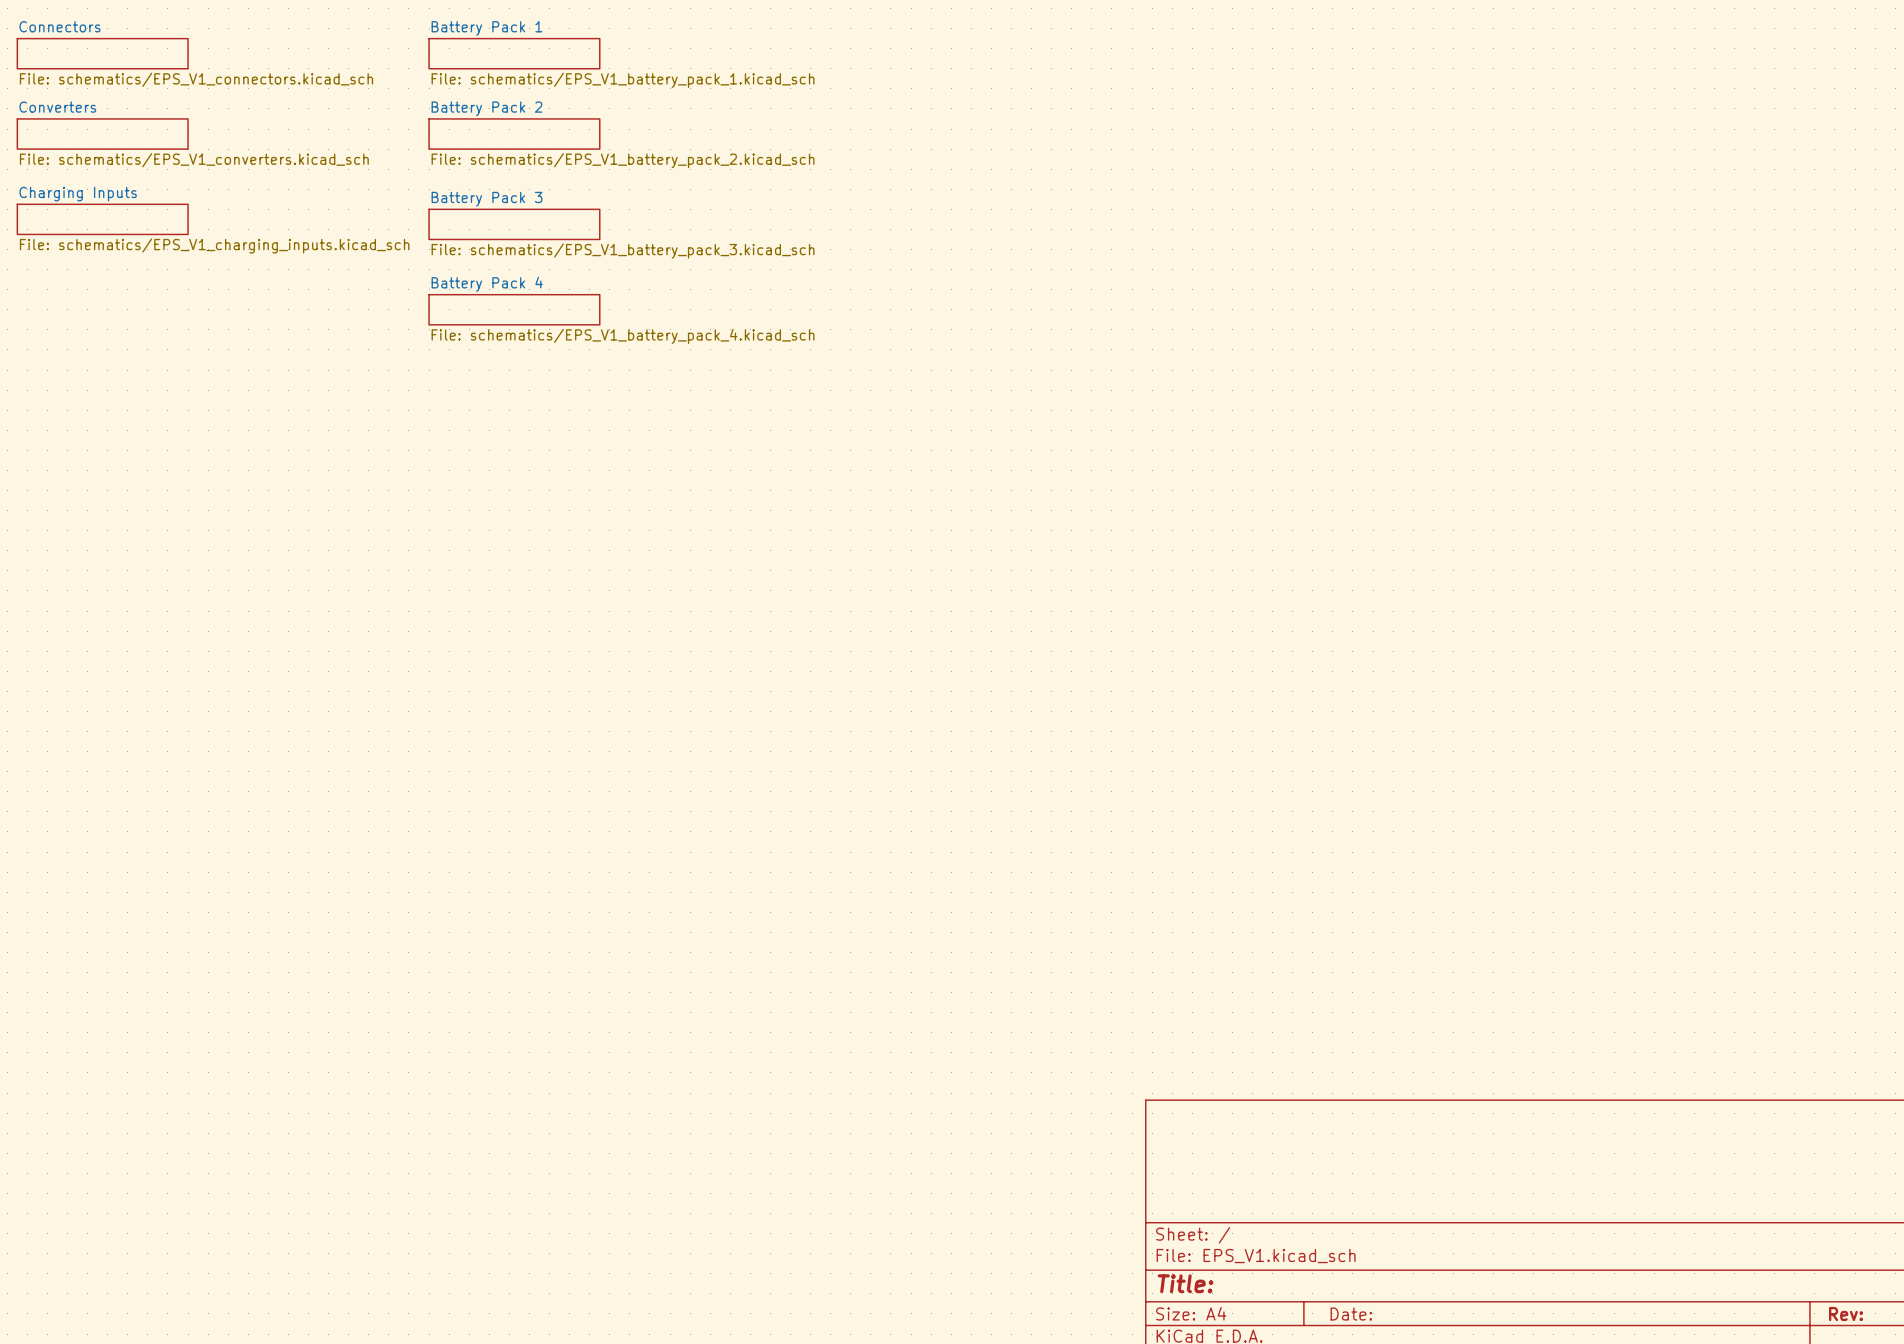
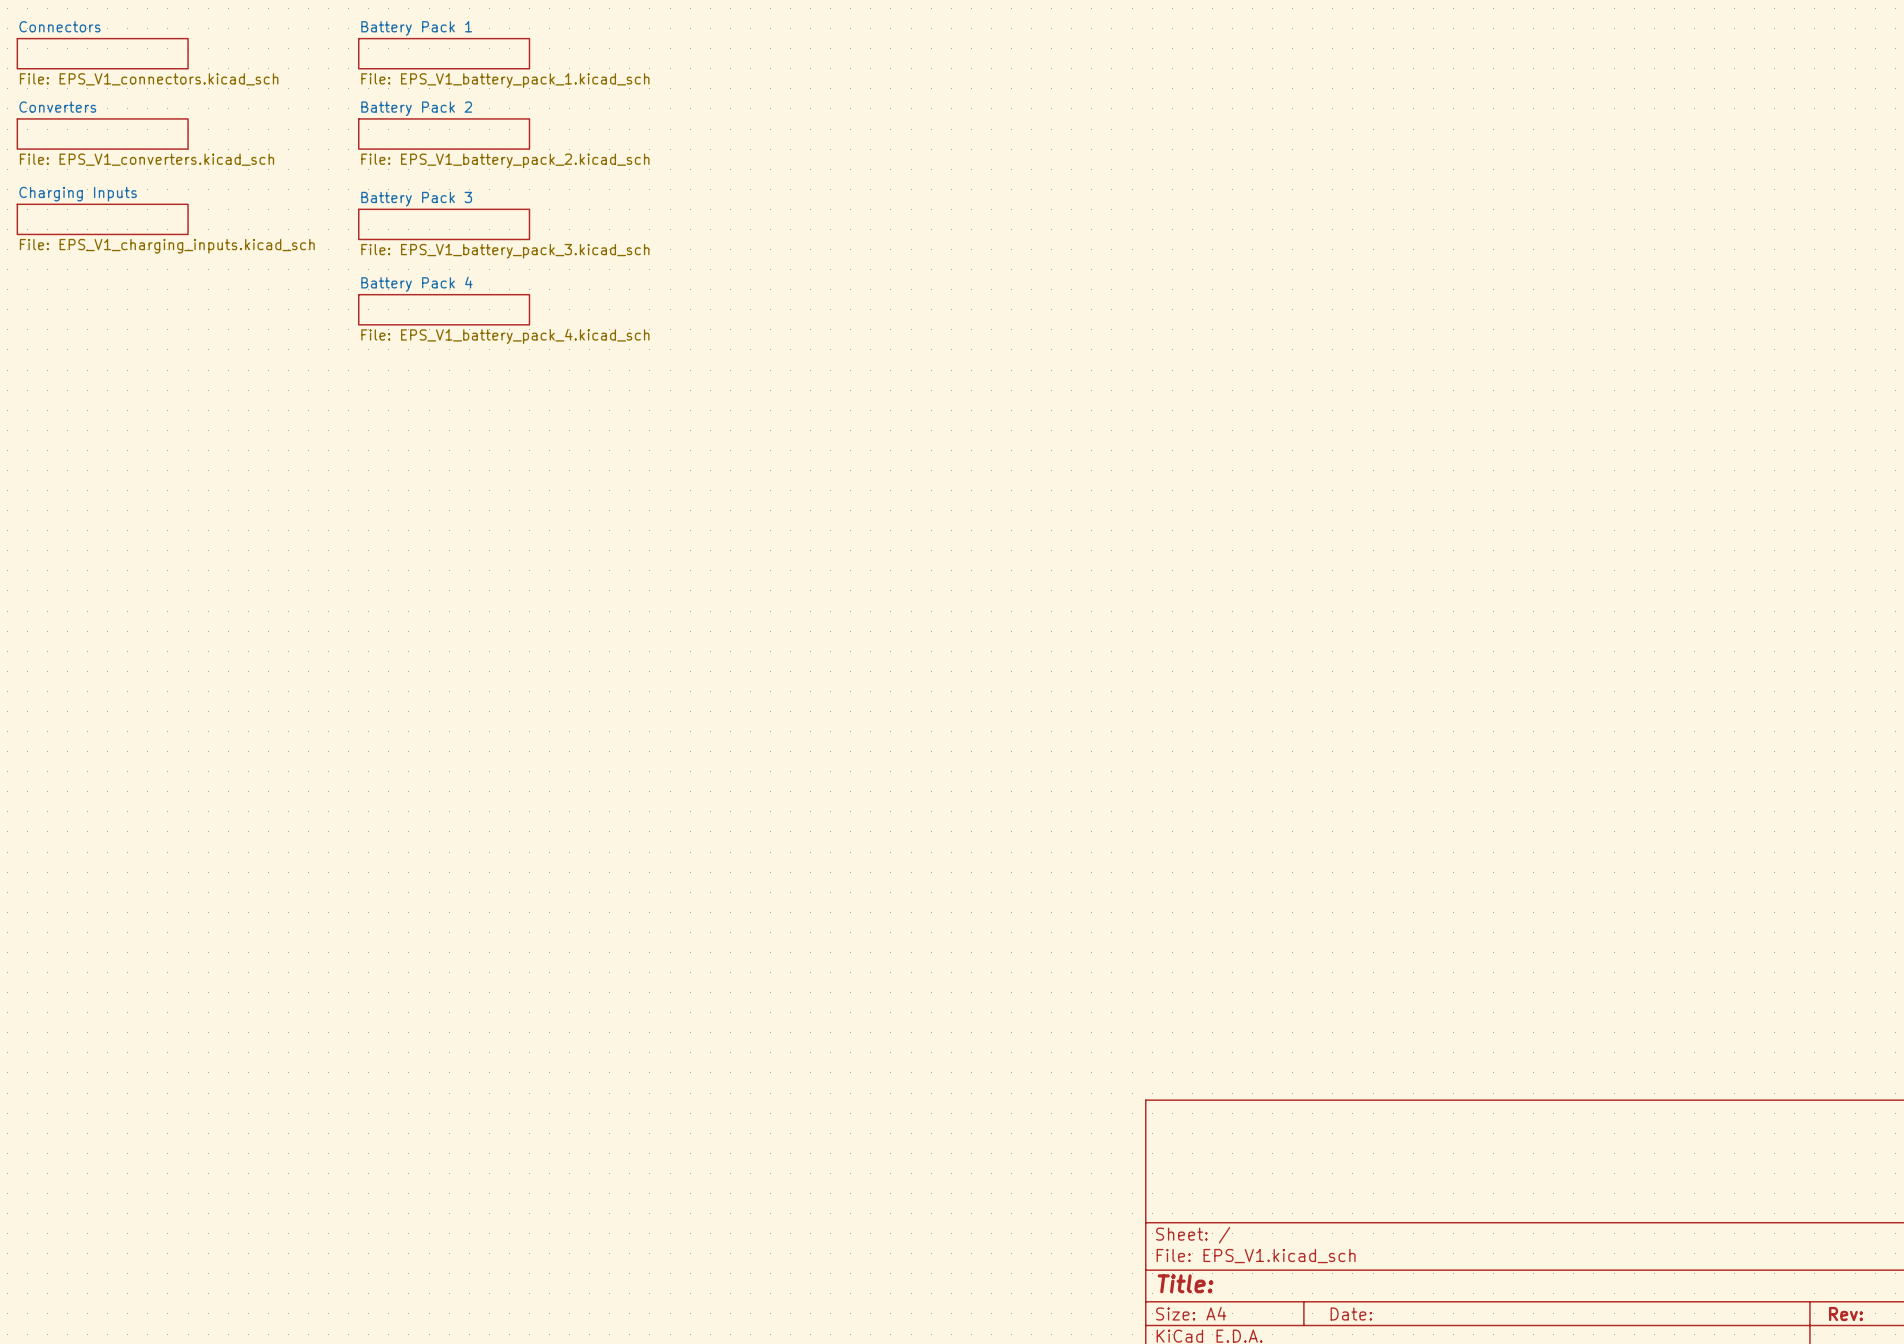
sheet Battery Pack 1 position: (514, 53) -> (444, 53)
sheet Connectors value: File: schematics/EPS_V1_connectors.kicad_sch (196, 79) -> File: EPS_V1_connectors.kicad_sch (149, 79)
sheet Battery Pack 1 value: File: schematics/EPS_V1_battery_pack_1.kicad_sch (623, 80) -> File: EPS_V1_battery_pack_1.kicad_sch (505, 80)
sheet Battery Pack 2 position: (514, 134) -> (444, 134)
sheet Converters value: File: schematics/EPS_V1_converters.kicad_sch (194, 160) -> File: EPS_V1_converters.kicad_sch (146, 159)
sheet Battery Pack 2 value: File: schematics/EPS_V1_battery_pack_2.kicad_sch (623, 160) -> File: EPS_V1_battery_pack_2.kicad_sch (505, 160)
sheet Battery Pack 3 position: (514, 224) -> (444, 224)
sheet Charging Inputs value: File: schematics/EPS_V1_charging_inputs.kicad_sch (214, 245) -> File: EPS_V1_charging_inputs.kicad_sch (167, 246)
sheet Battery Pack 3 value: File: schematics/EPS_V1_battery_pack_3.kicad_sch (623, 251) -> File: EPS_V1_battery_pack_3.kicad_sch (505, 251)
sheet Battery Pack 4 position: (514, 309) -> (444, 309)
sheet Battery Pack 4 value: File: schematics/EPS_V1_battery_pack_4.kicad_sch (623, 336) -> File: EPS_V1_battery_pack_4.kicad_sch (505, 336)

